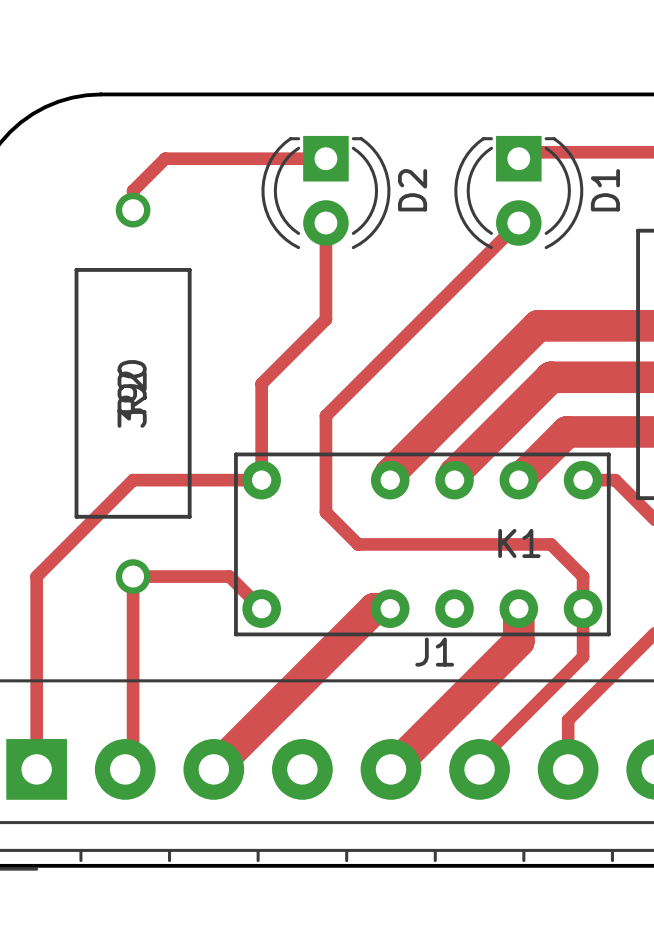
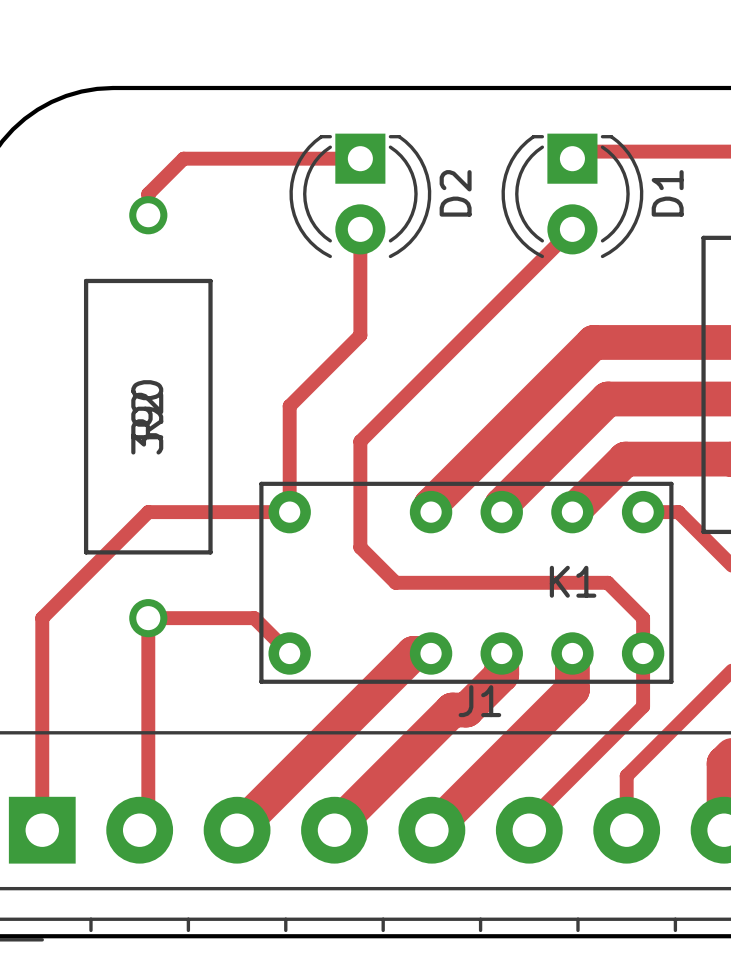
track: none -> (501, 653) (501, 674) (466, 710) (452, 710) (334, 827) (334, 830)

